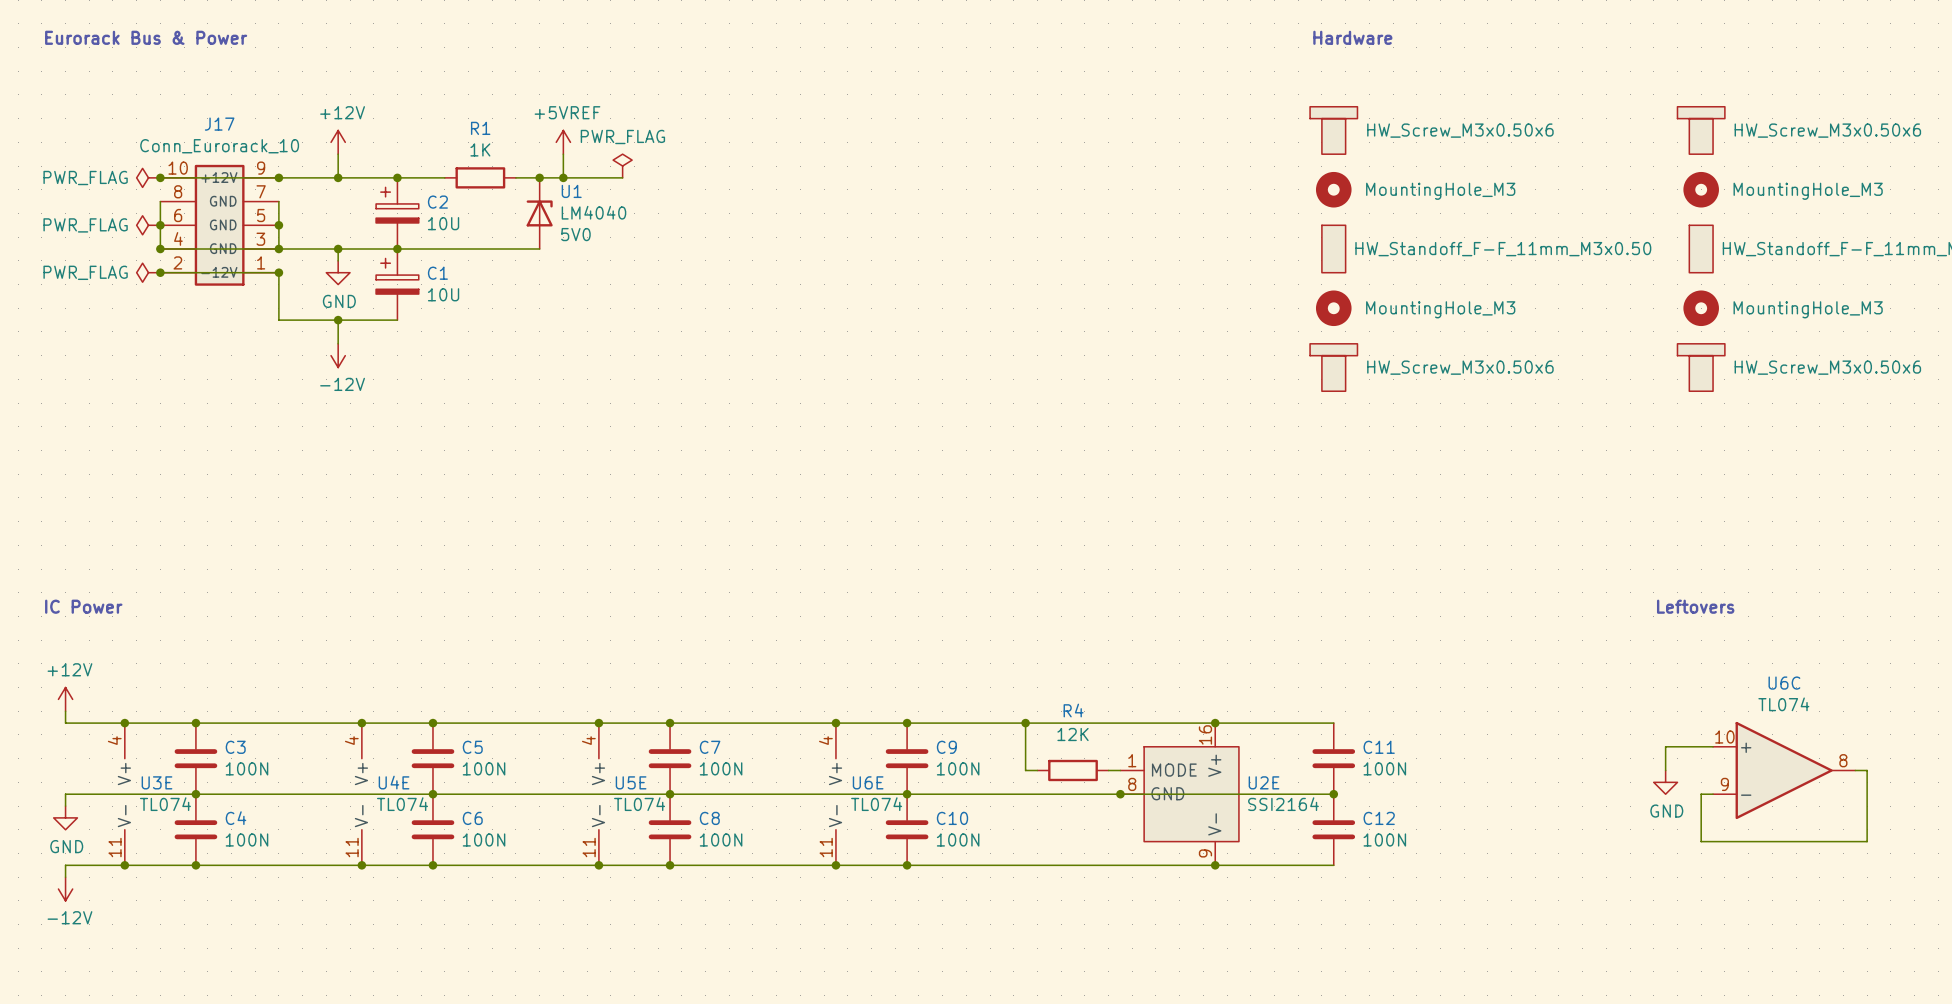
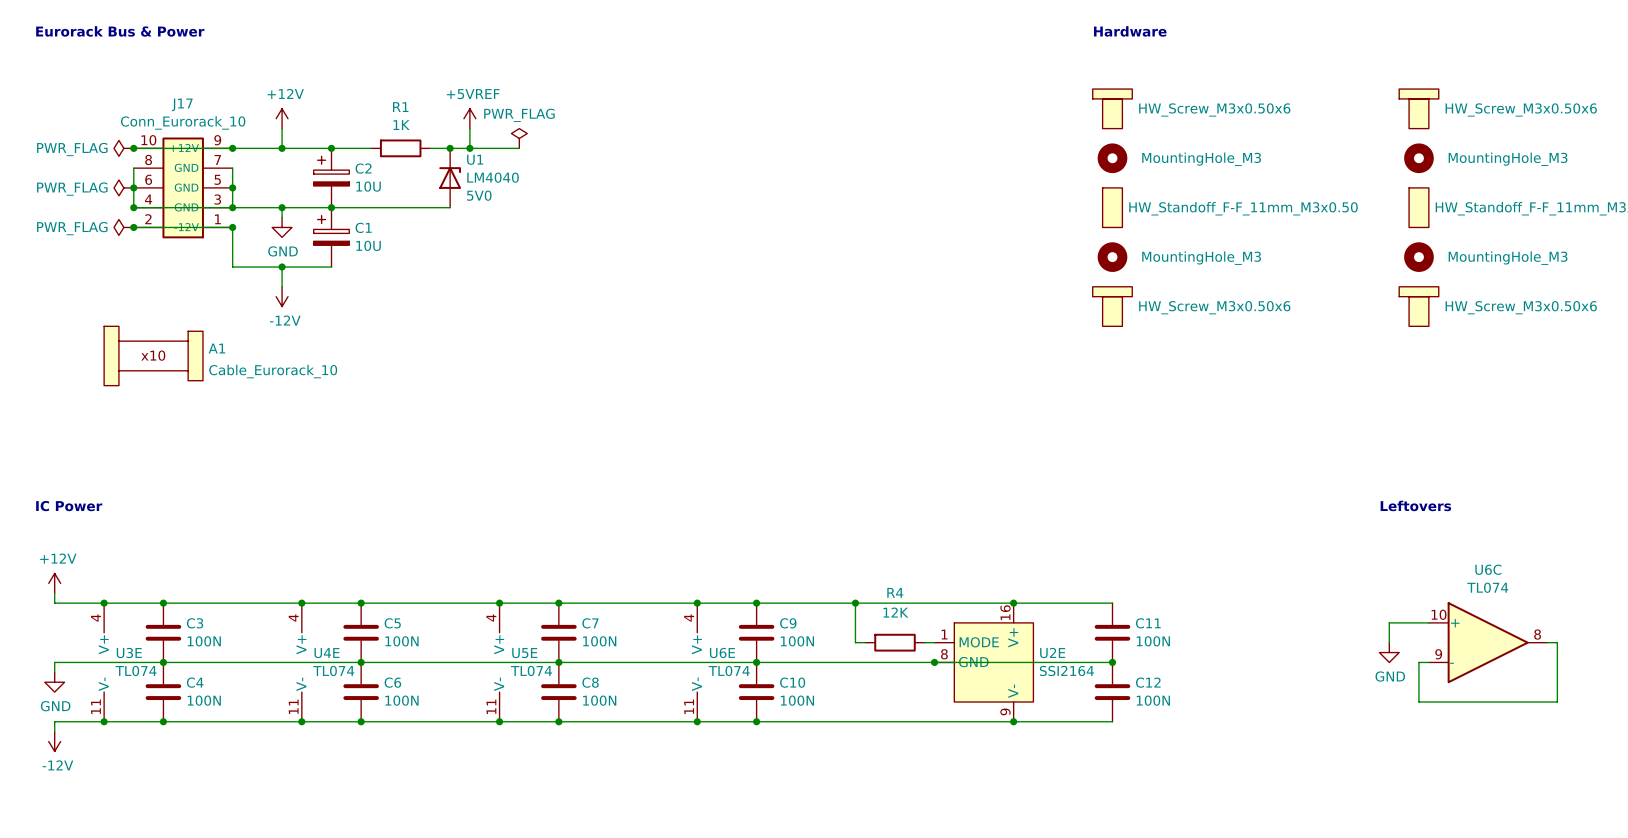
A1: none -> Cable_Eurorack_10 (153, 355)

